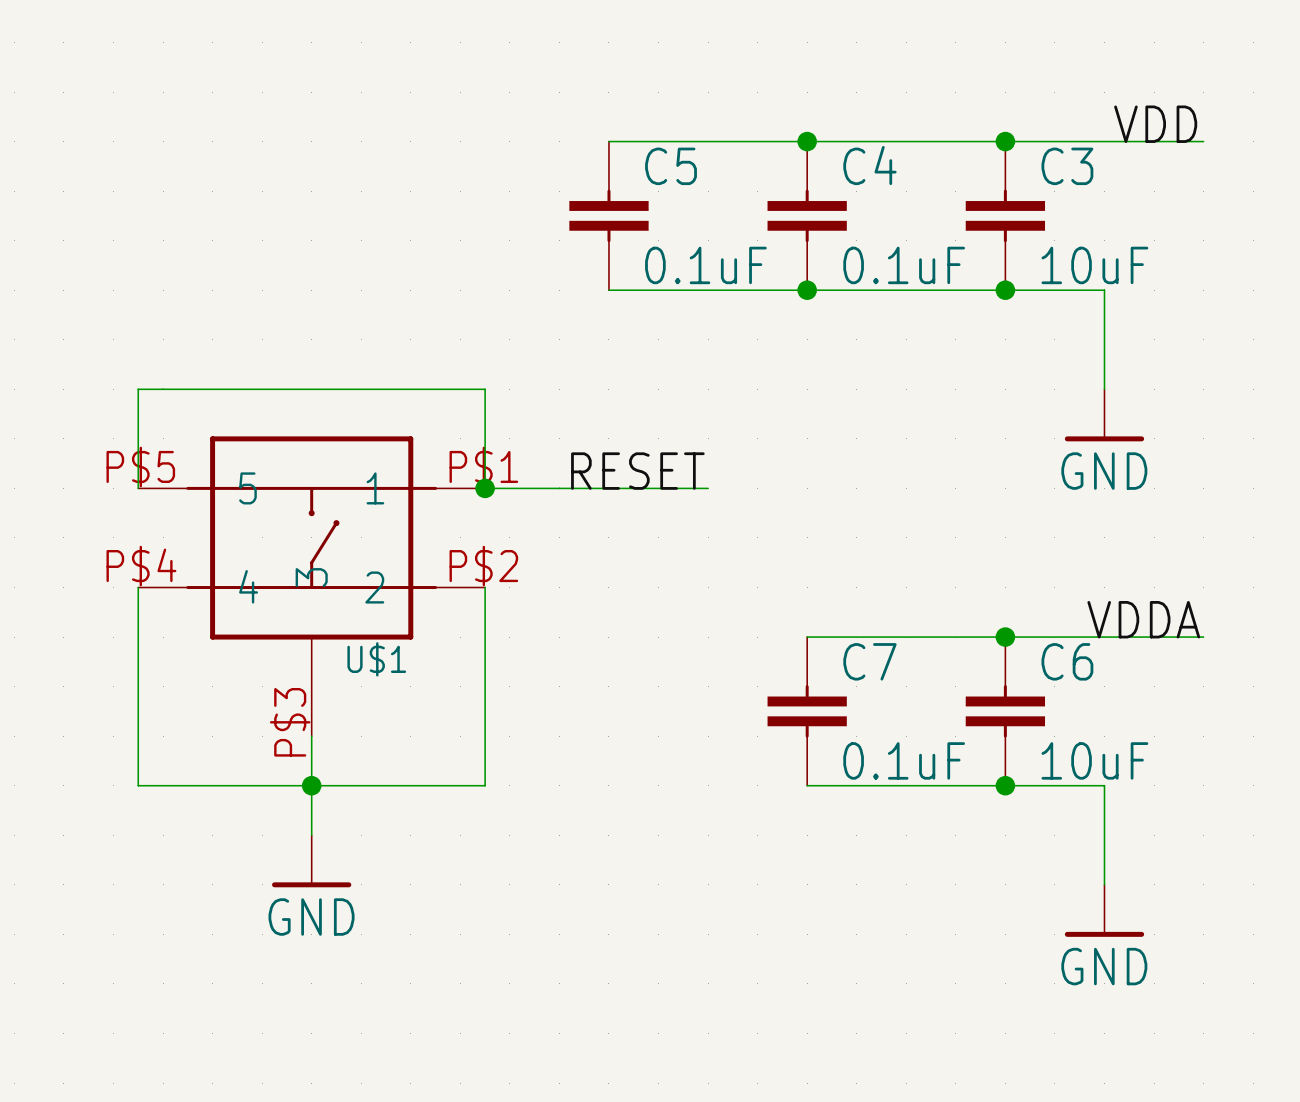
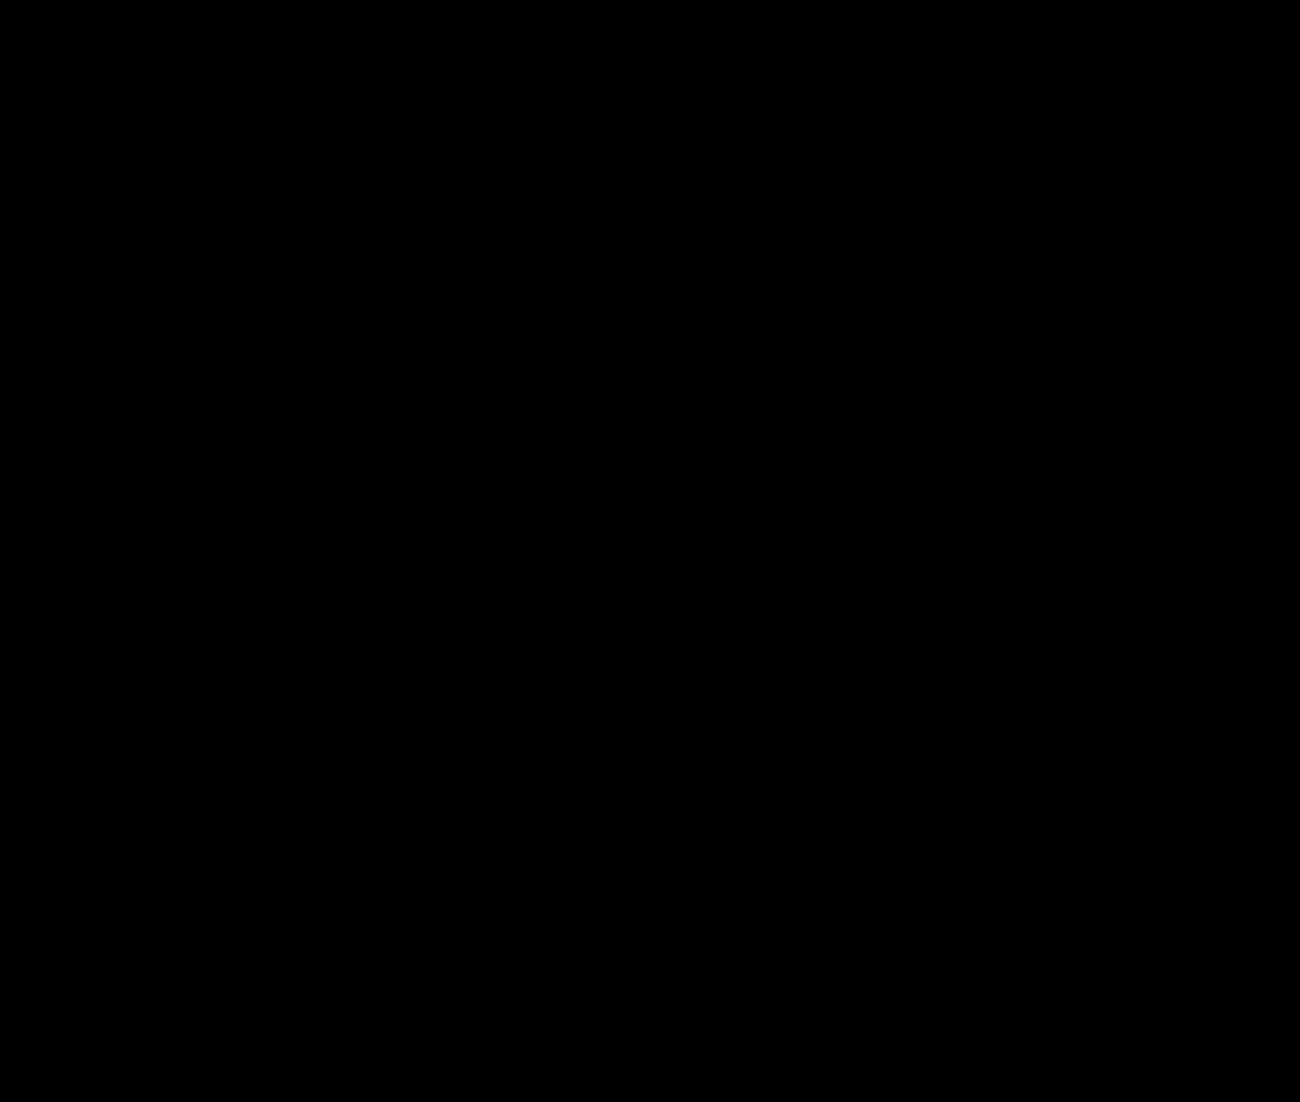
label: VDD (1155, 124) -> none
wire: (608, 141) (1203, 141) -> none
junction: (807, 141) -> none
junction: (1005, 141) -> none
C5: 0.1uF (608, 215) -> none
C4: 0.1uF (807, 215) -> none
C3: 10uF (1005, 215) -> none
wire: (608, 290) (1104, 290) (1104, 389) -> none
junction: (807, 290) -> none
junction: (1005, 290) -> none
power symbol: GND (1104, 415) -> none
label: RESET (637, 471) -> none
wire: (138, 488) (138, 389) (485, 389) (485, 488) (708, 488) -> none
junction: (485, 488) -> none
U$1: (311, 586) -> none
wire: (138, 587) (138, 785) (485, 785) (485, 587) -> none
label: VDDA (1143, 619) -> none
wire: (807, 637) (1203, 637) -> none
junction: (1005, 637) -> none
C7: 0.1uF (807, 711) -> none
C6: 10uF (1005, 711) -> none
wire: (311, 736) (311, 835) -> none
junction: (311, 785) -> none
wire: (807, 785) (1104, 785) (1104, 884) -> none
junction: (1005, 785) -> none
power symbol: GND (311, 861) -> none
power symbol: GND (1104, 910) -> none

